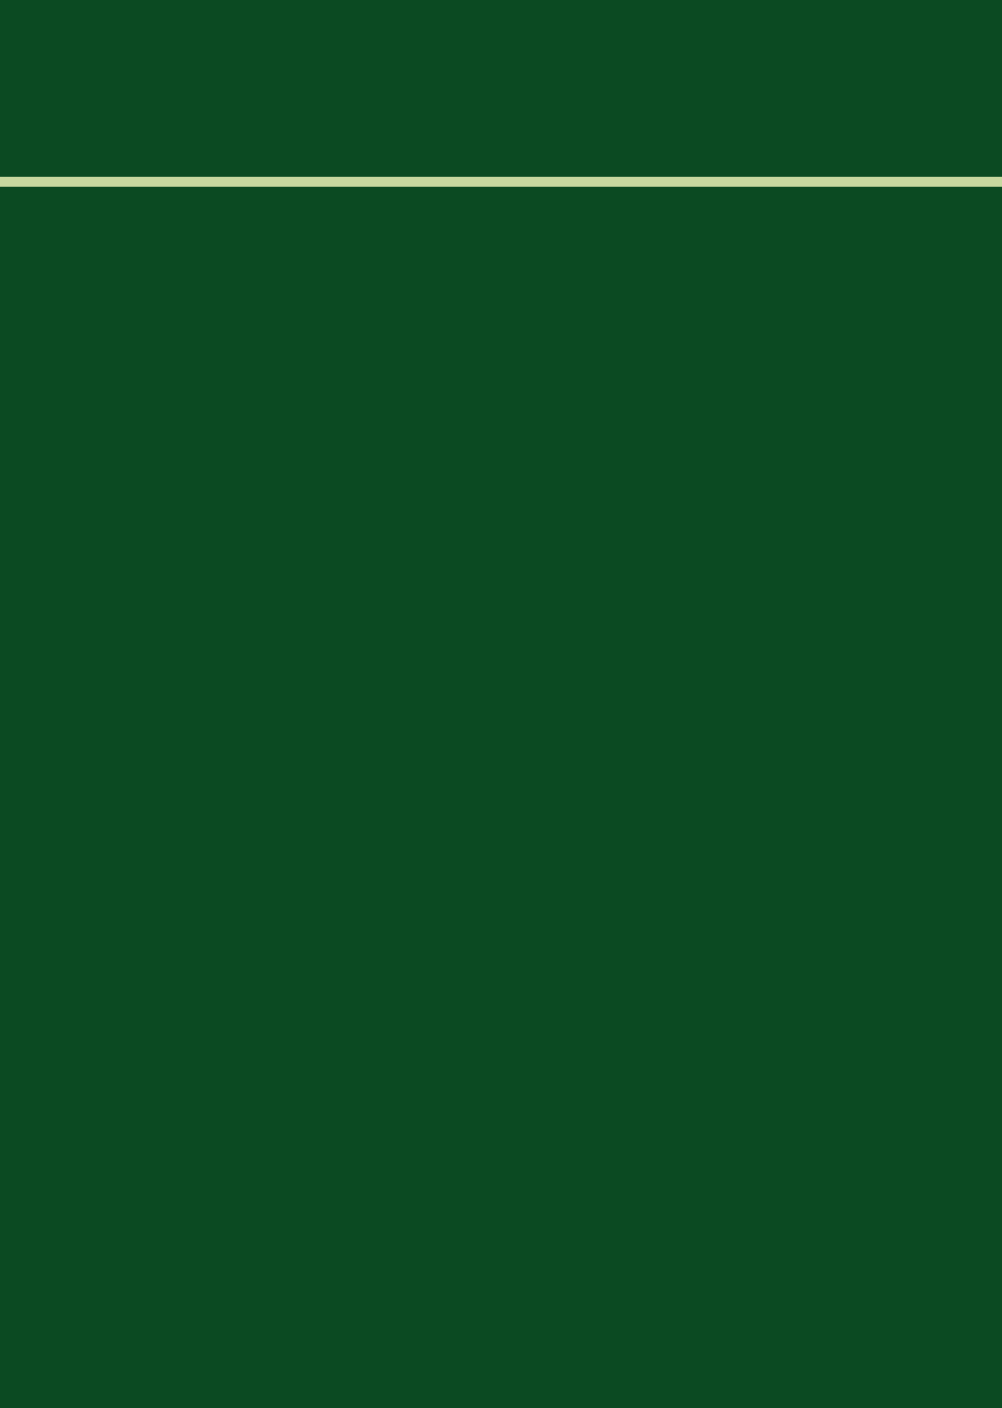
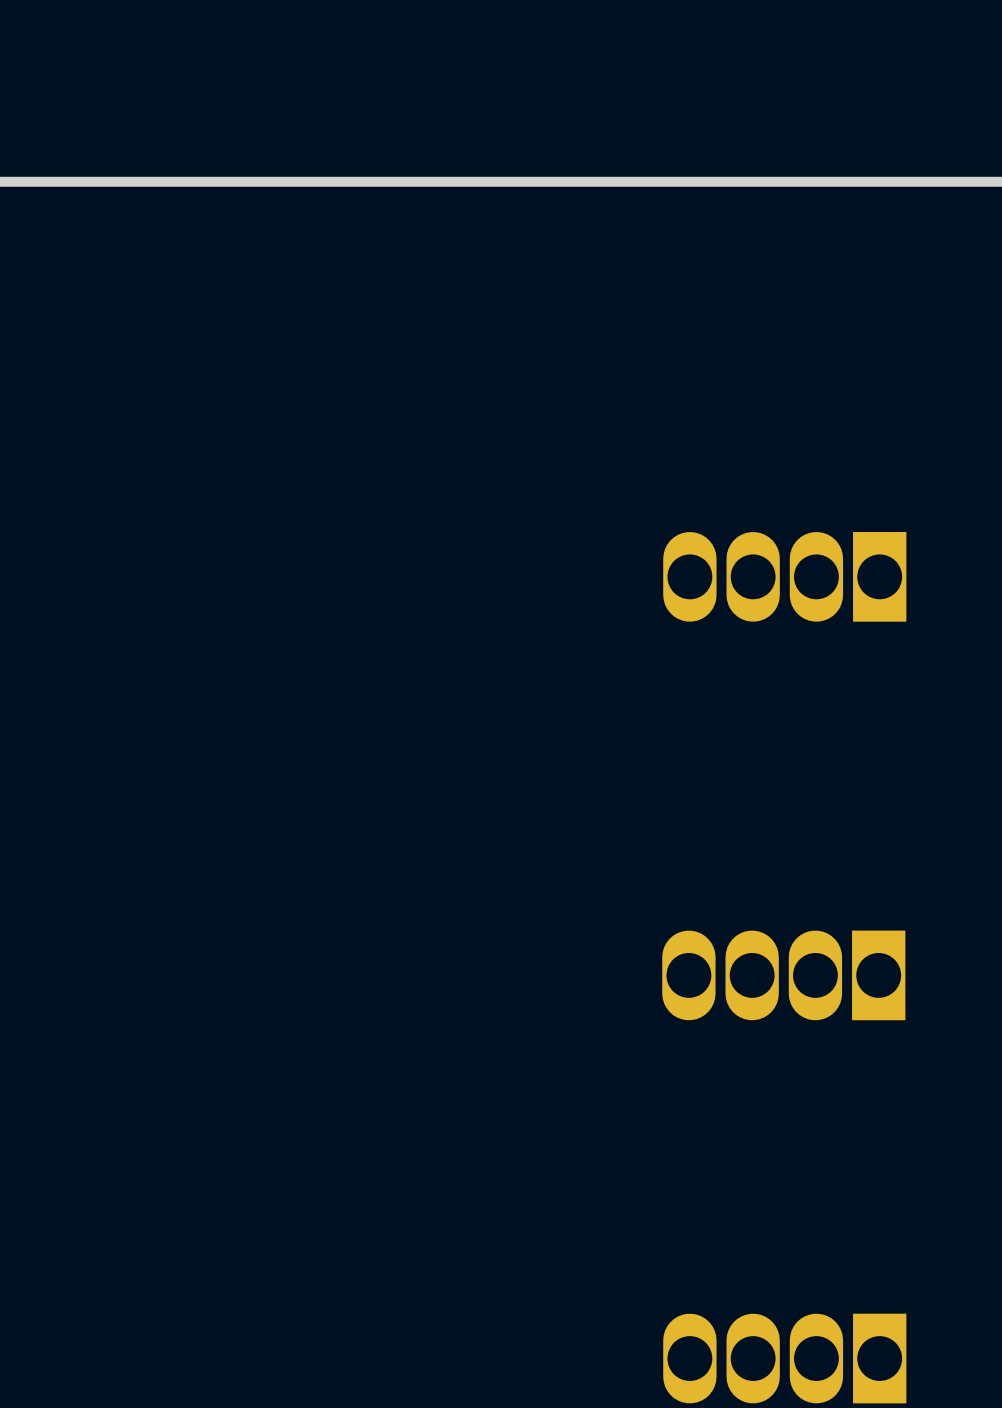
part: none -> (784, 576)
part: none -> (783, 975)
part: none -> (784, 1358)

